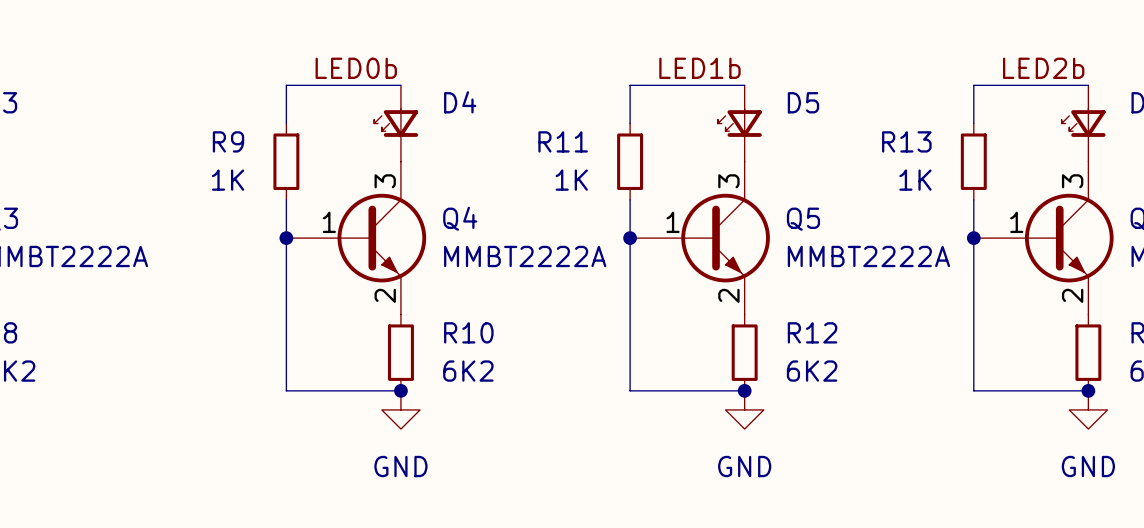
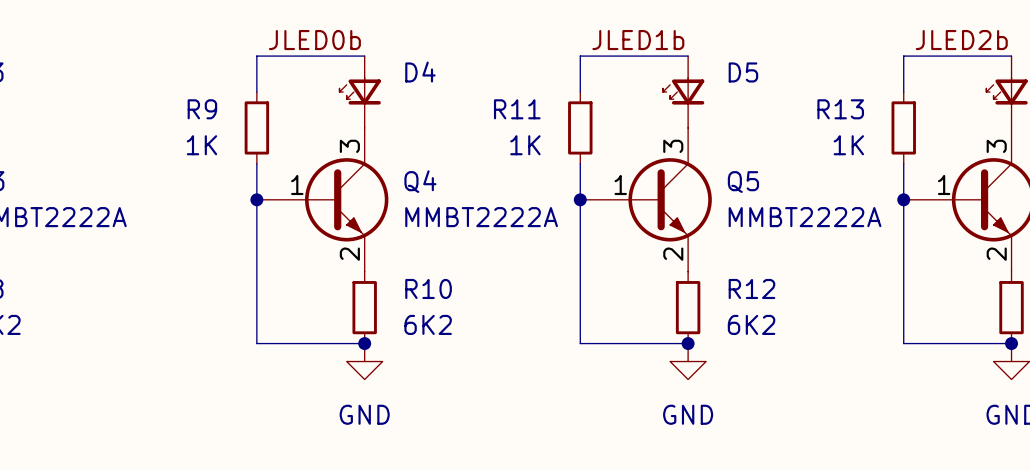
label: LED0b (356, 68) -> JLED0b (314, 40)
label: LED1b (699, 68) -> JLED1b (638, 40)
label: LED2b (1043, 68) -> JLED2b (961, 40)

